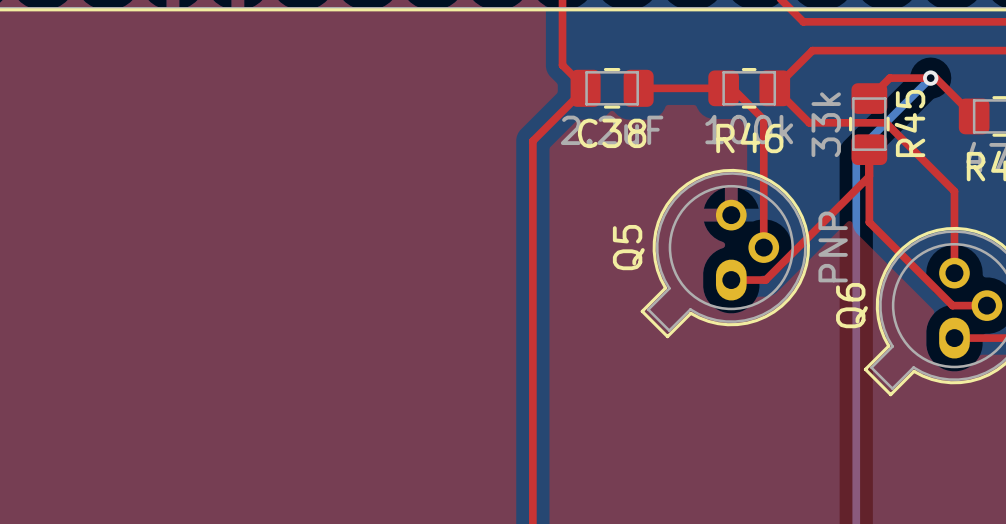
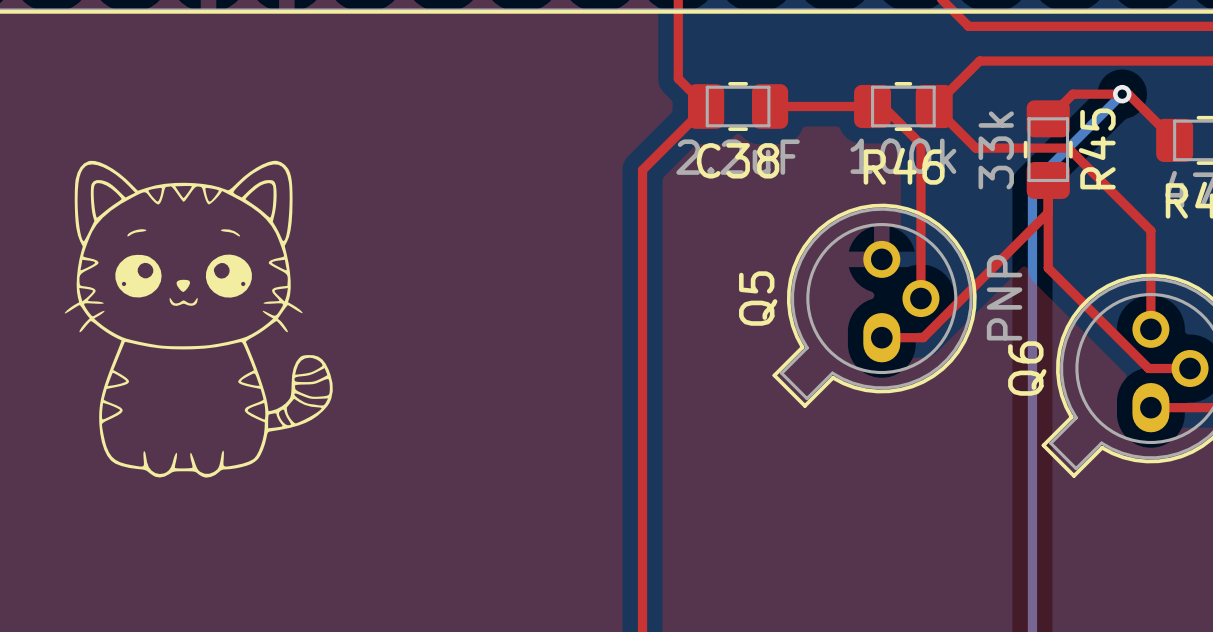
drawing: none -> [64, 160, 333, 478]

